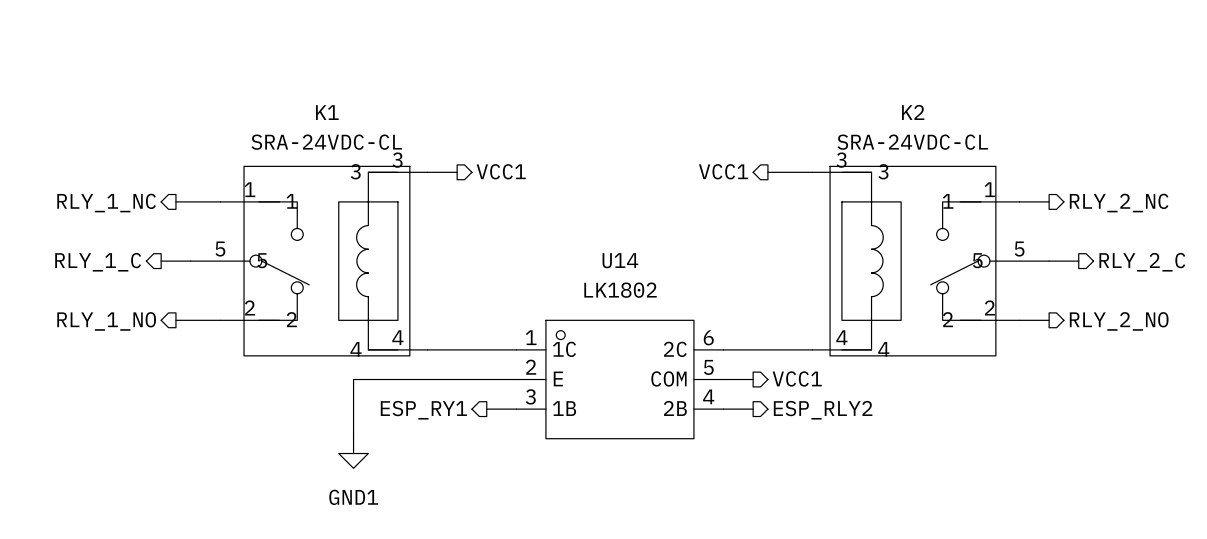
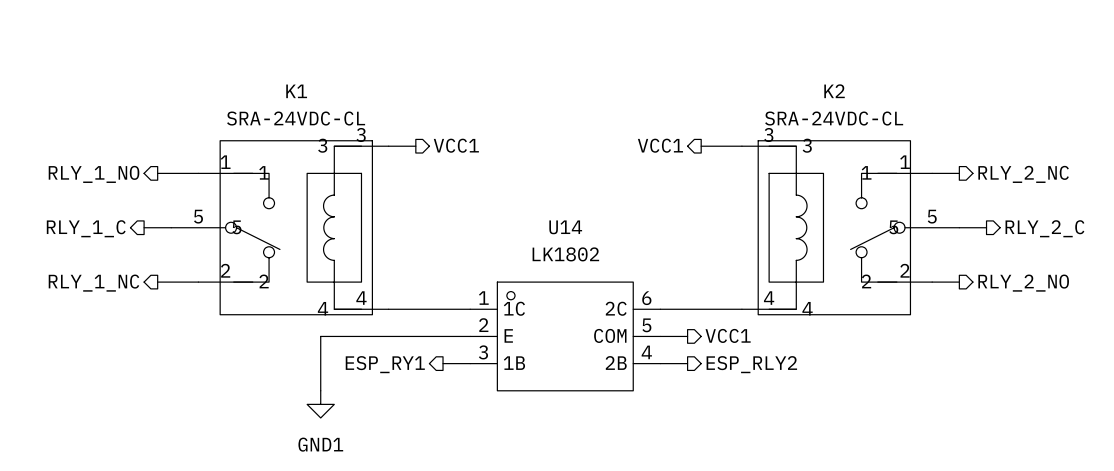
hierarchical label: RLY_1_NC (106, 203) -> RLY_1_NO (94, 174)
hierarchical label: RLY_1_NO (106, 321) -> RLY_1_NC (93, 283)

